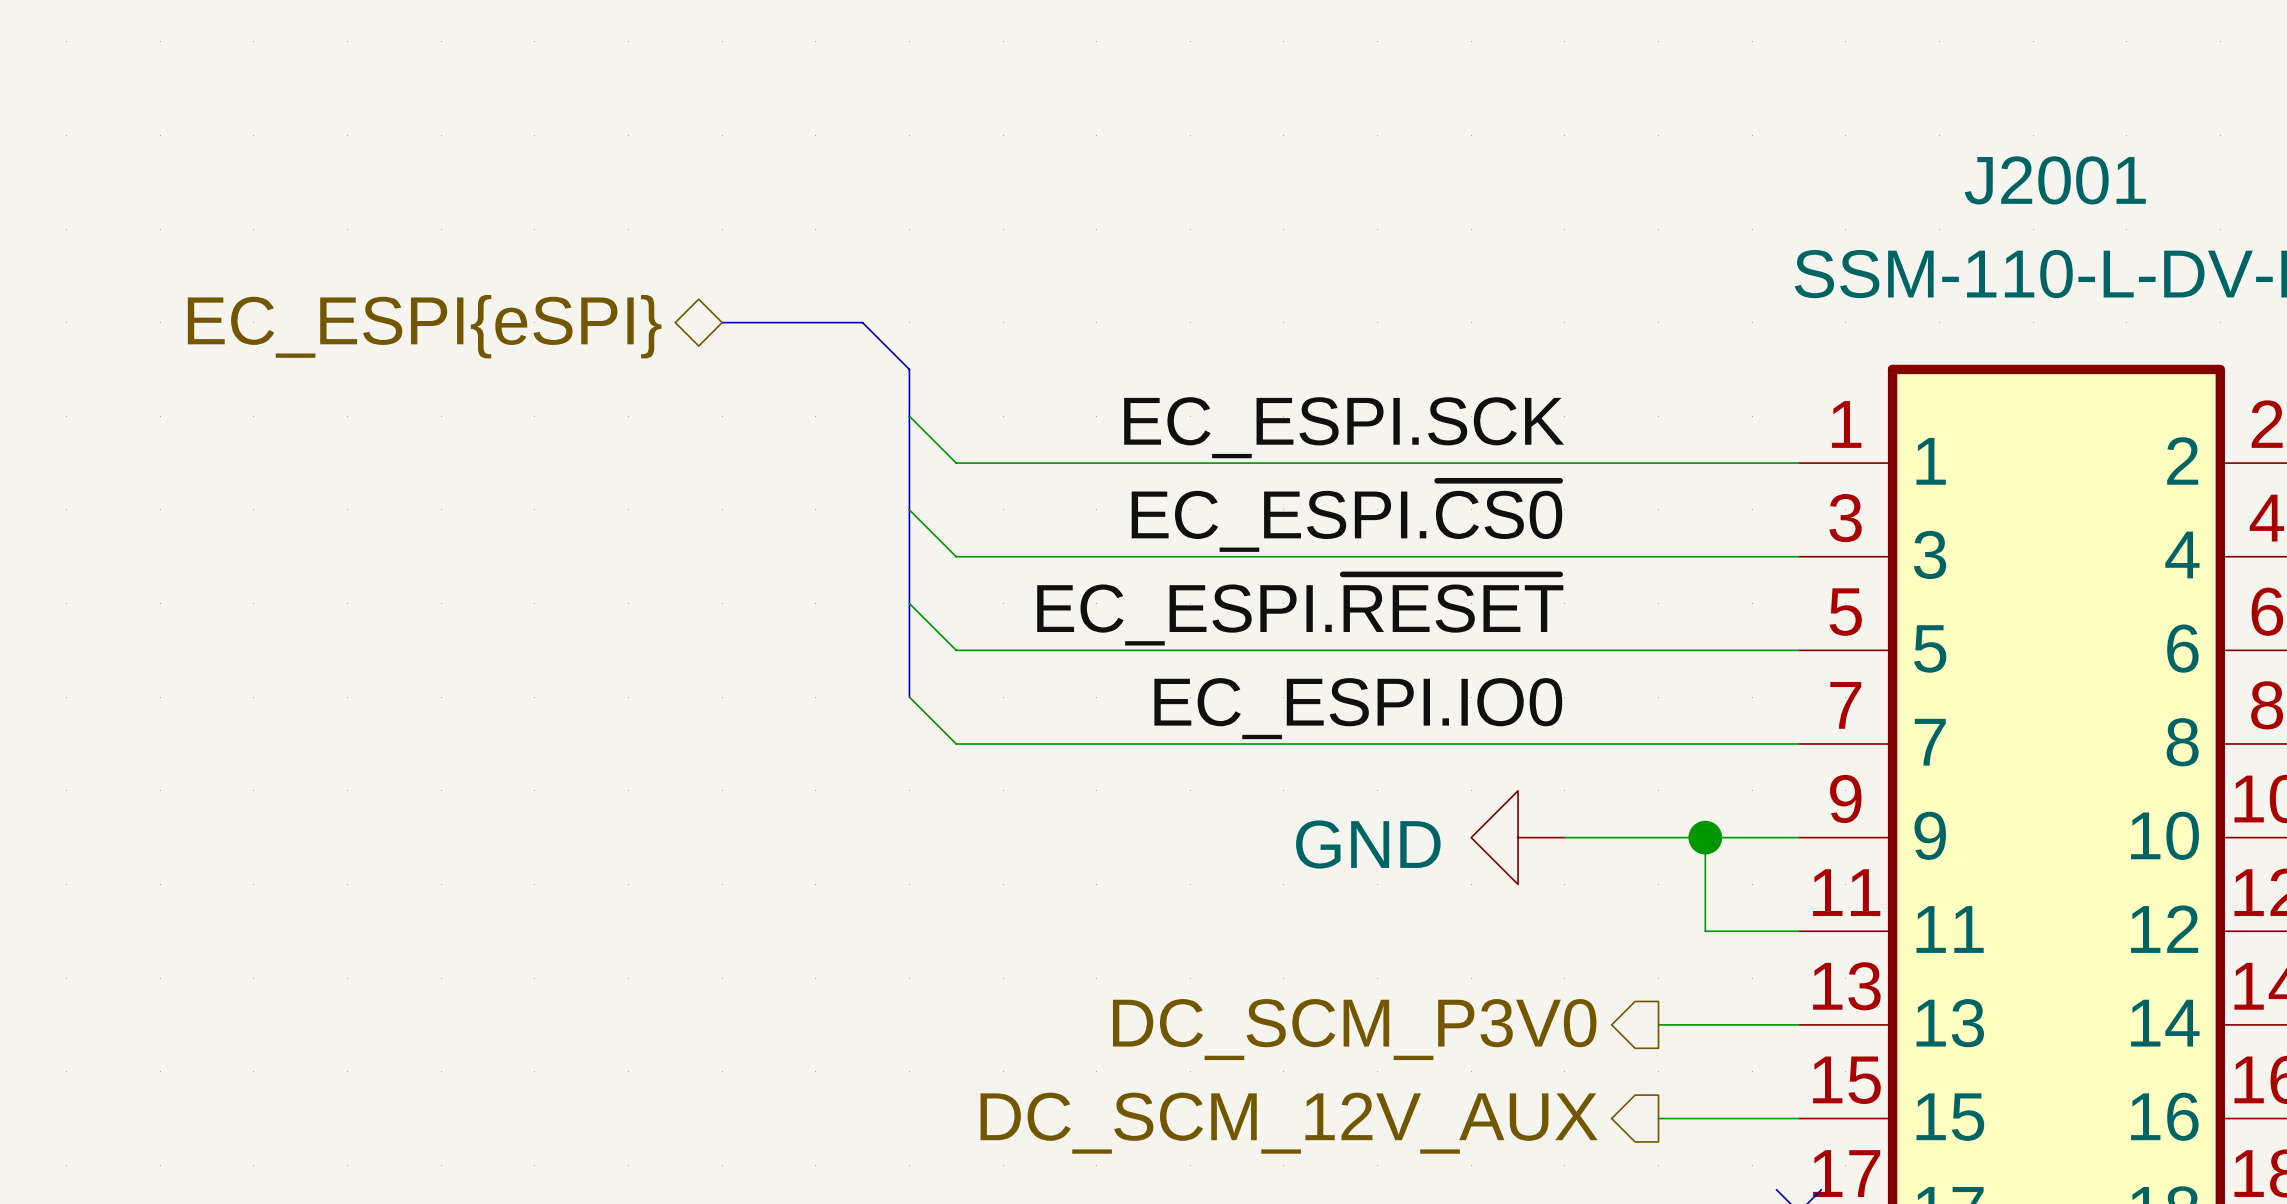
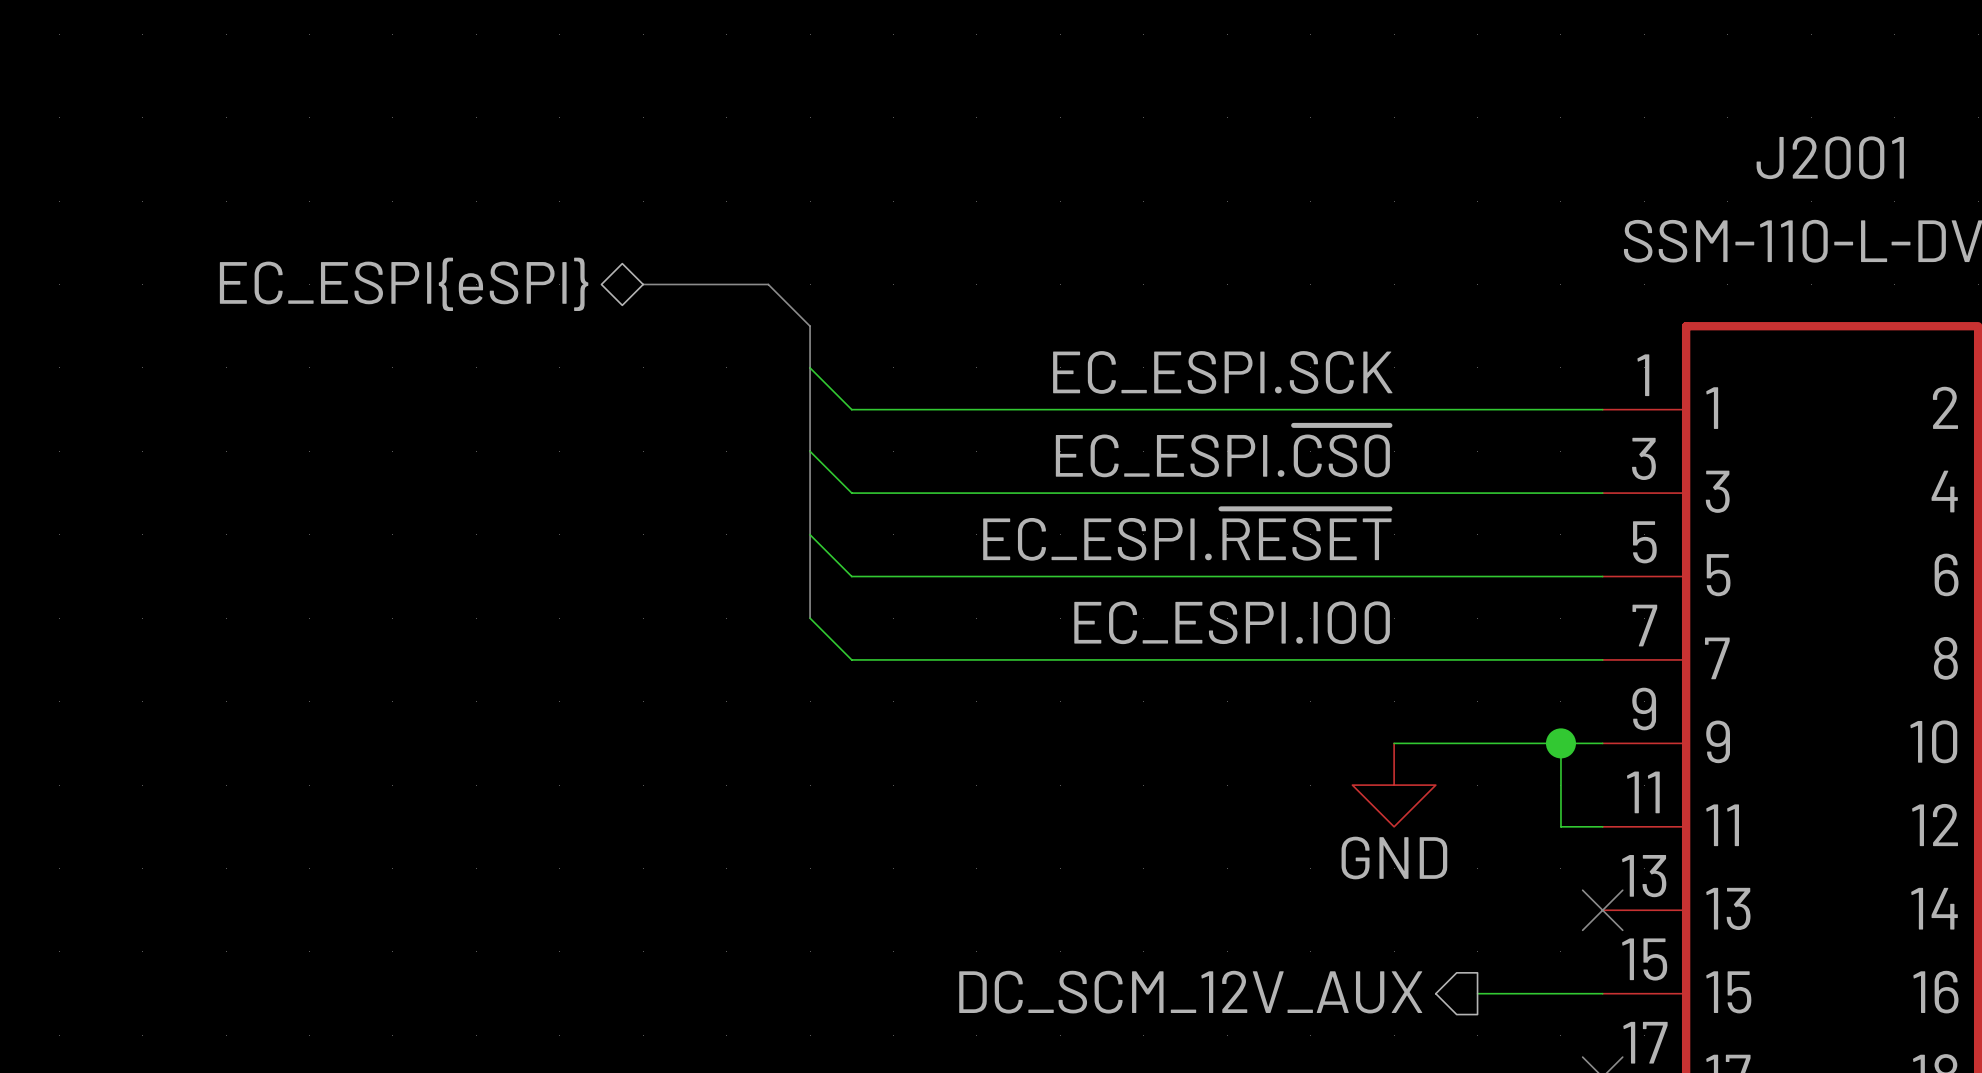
power symbol rotation: 0° (1518, 837) -> 90° counterclockwise (1394, 785)
power symbol position: GND (1518, 837) -> GND (1394, 785)
wire: (1705, 837) (1705, 931) (1752, 931) -> (1560, 743) (1560, 826)
junction position: (1705, 837) -> (1560, 743)
wire: (1658, 1024) (1798, 1024) -> none
no-connect mark: none -> (1602, 910)
hierarchical label: DC_SCM_P3V0 (1354, 1029) -> none

